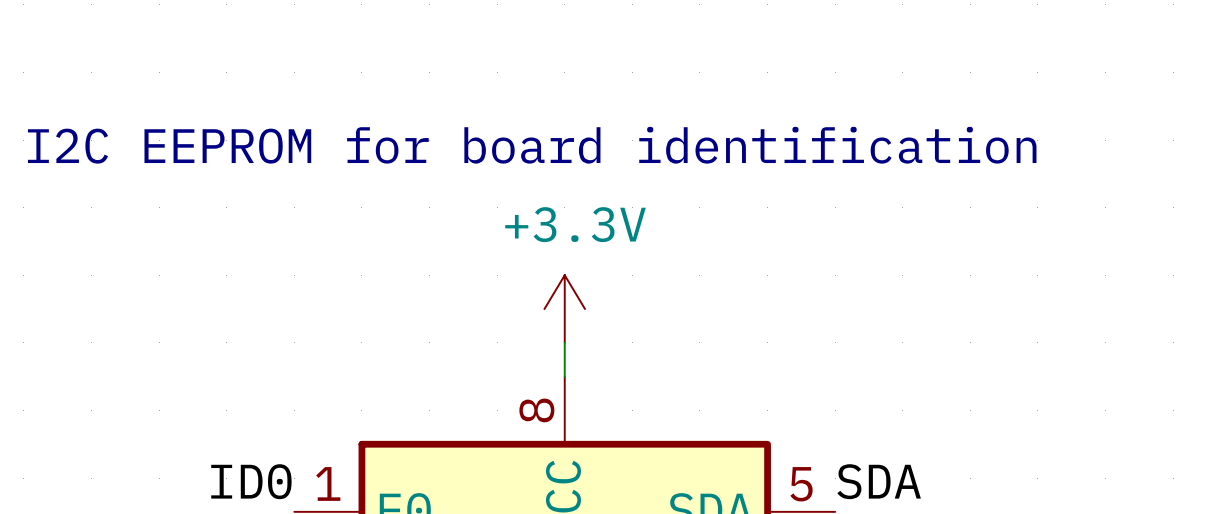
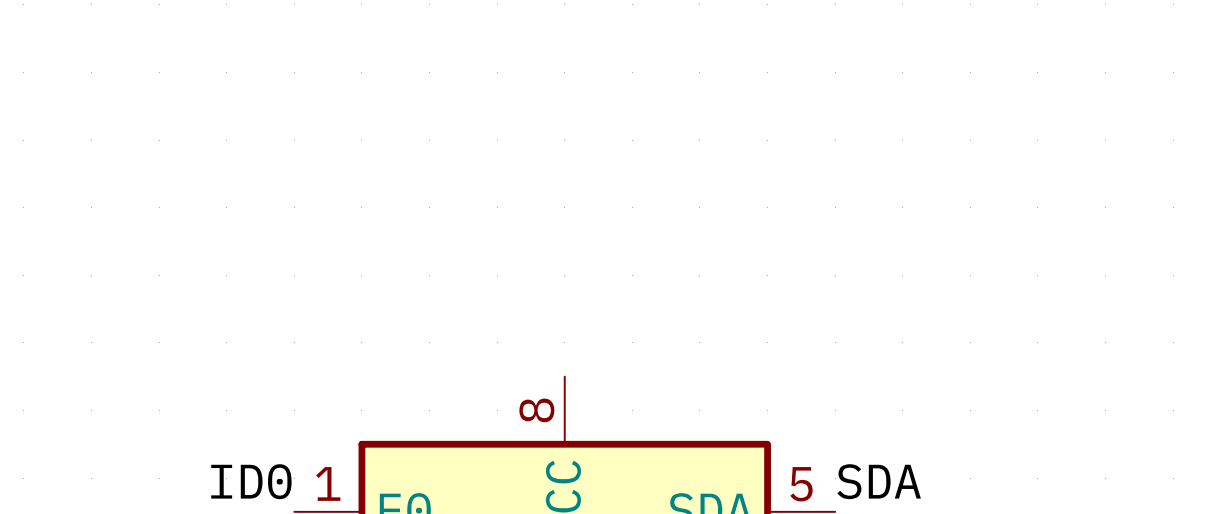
text: I2C EEPROM for board identification (532, 145) -> none
power symbol: +3.3V (564, 309) -> none
wire: (564, 342) (564, 376) -> none

